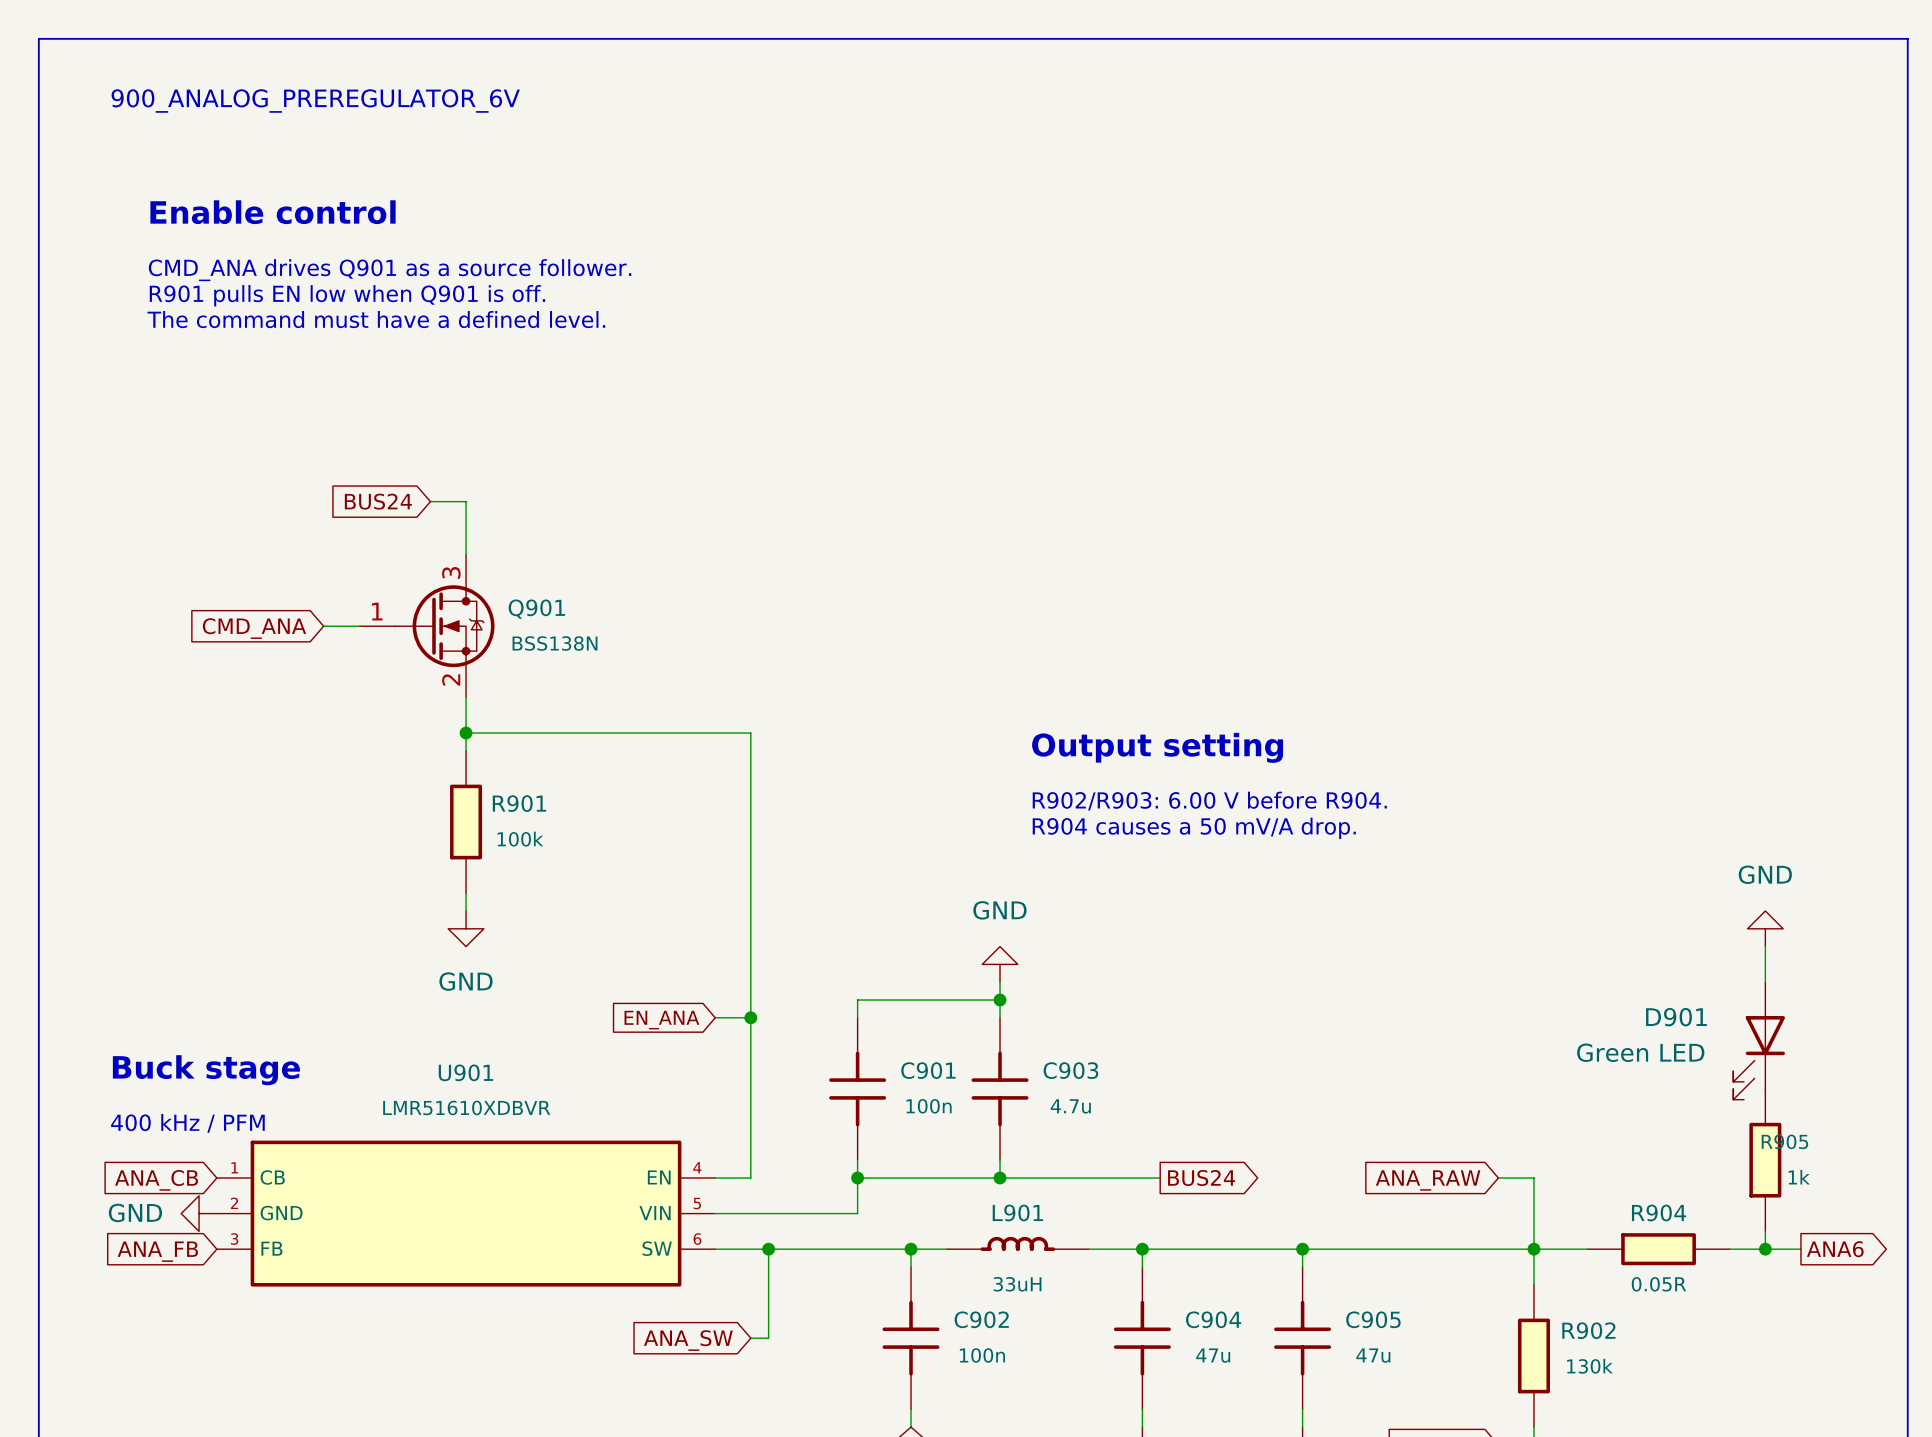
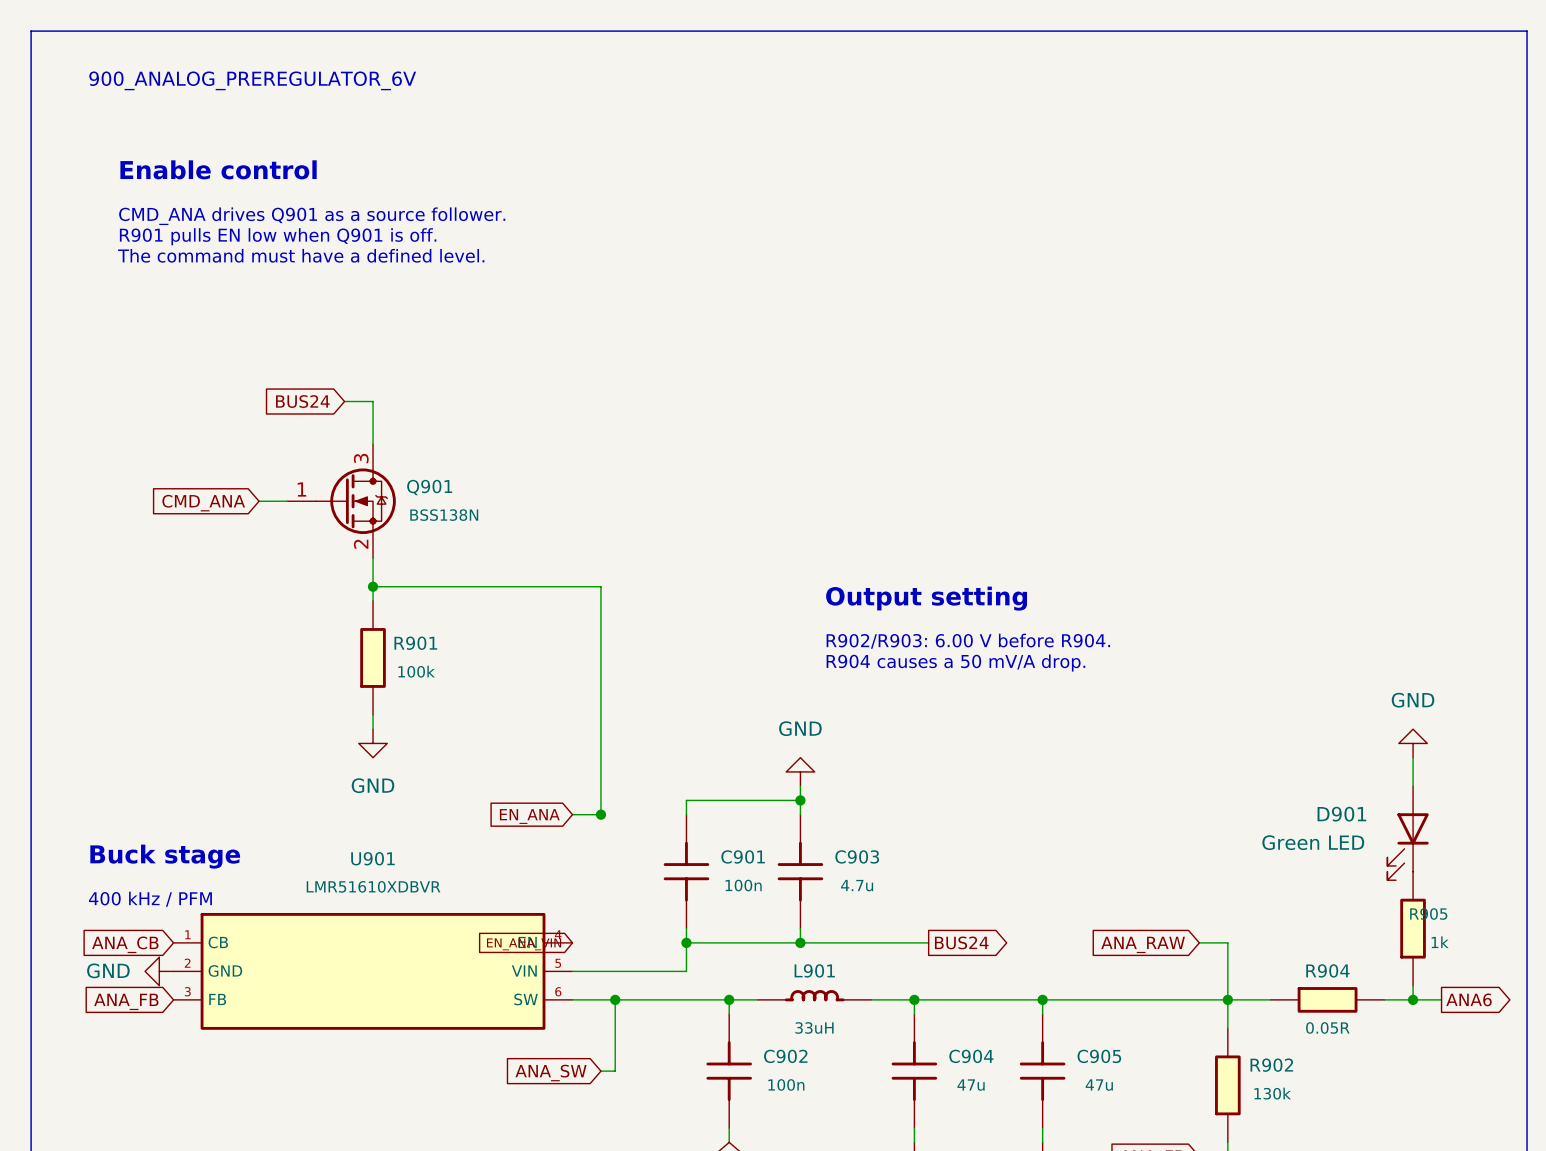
wire: (750, 1017) (750, 1177) (715, 1177) -> none
global label: none -> EN_ANA_VIN (524, 944)

